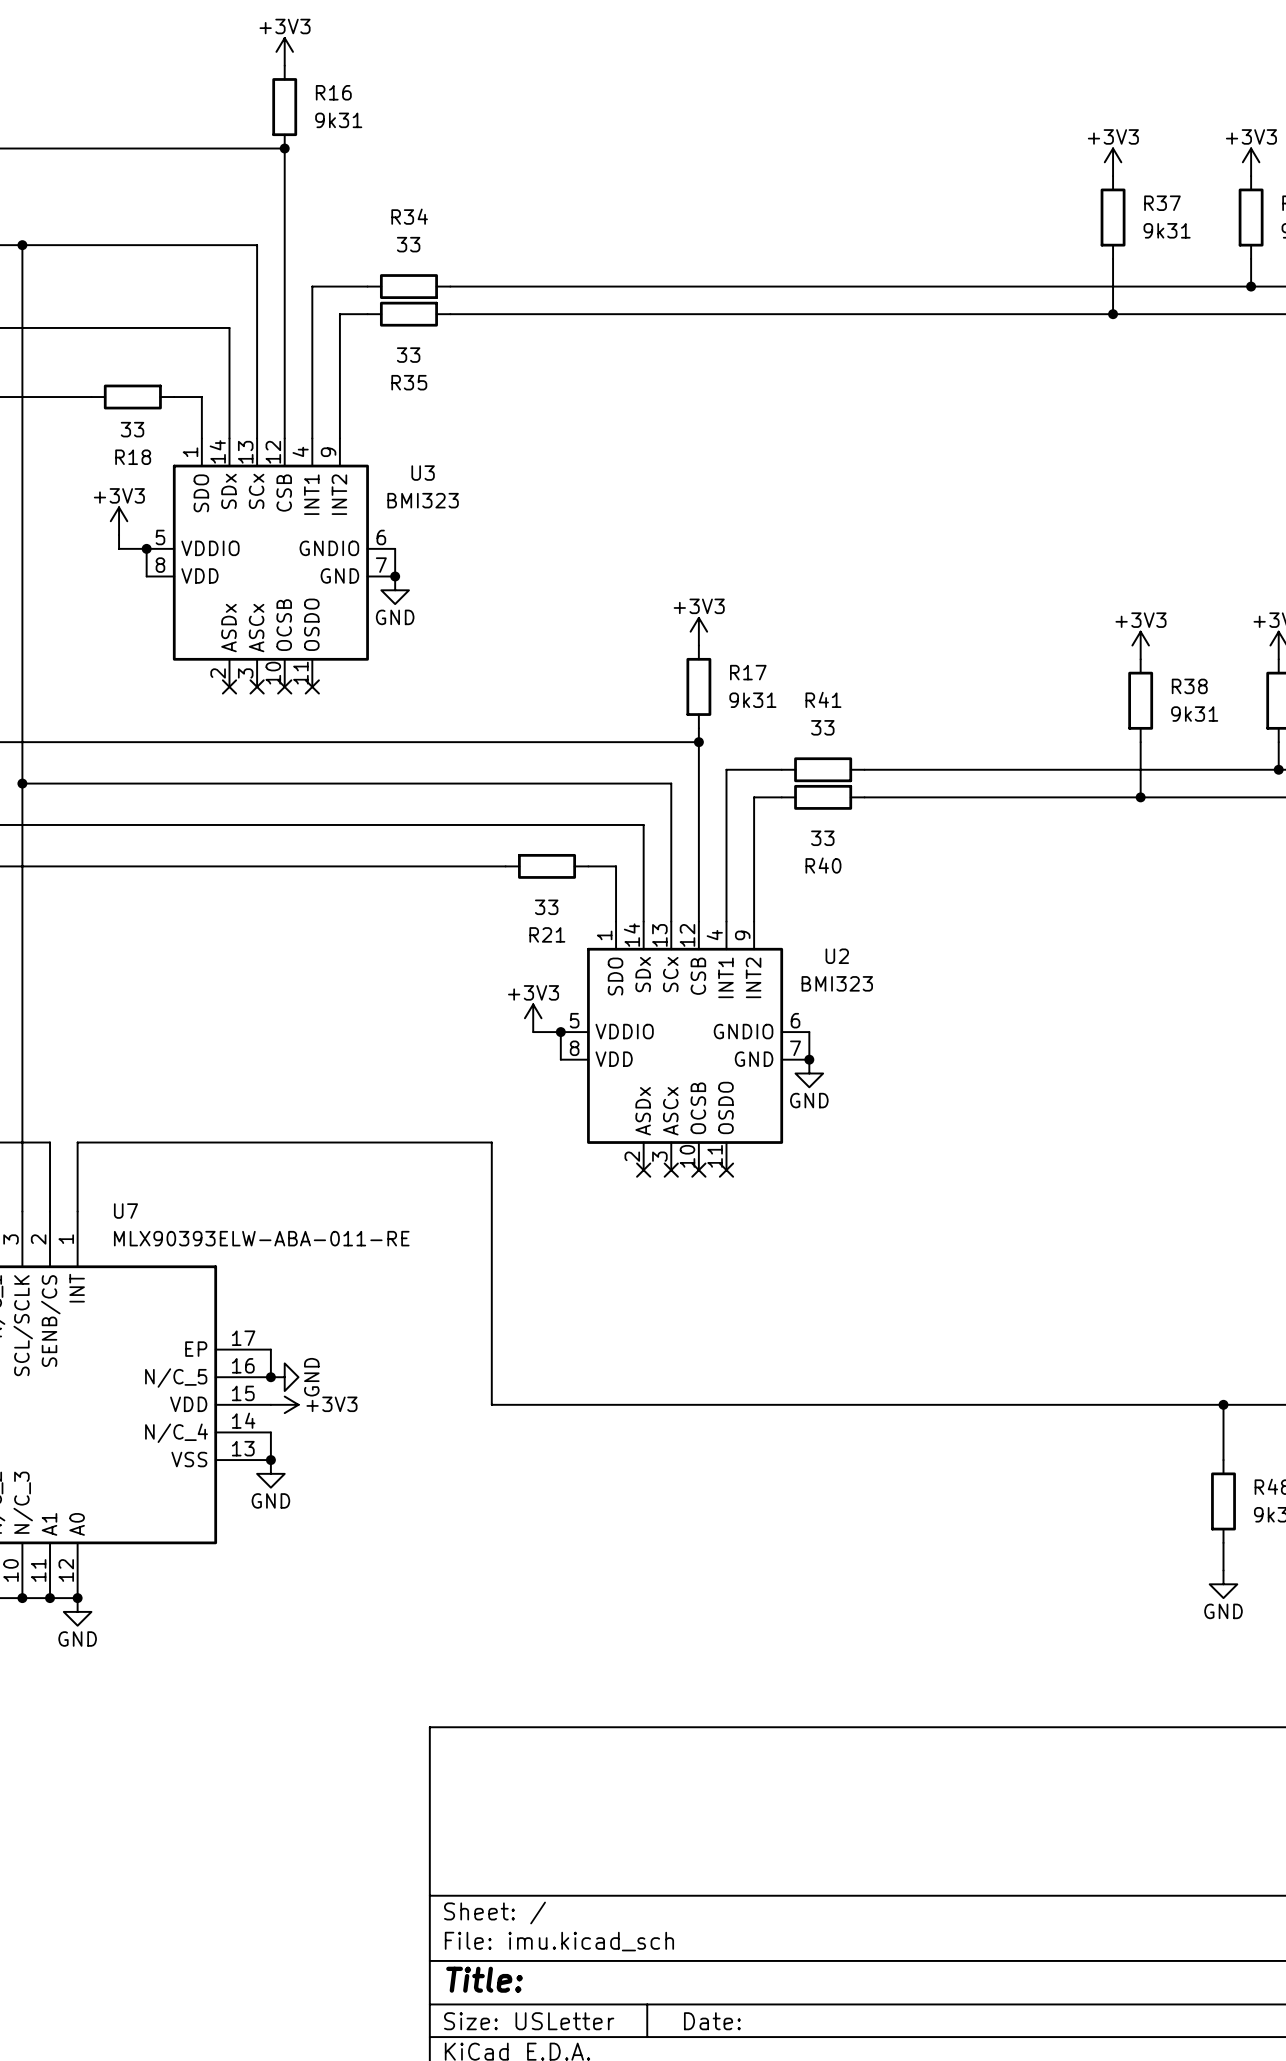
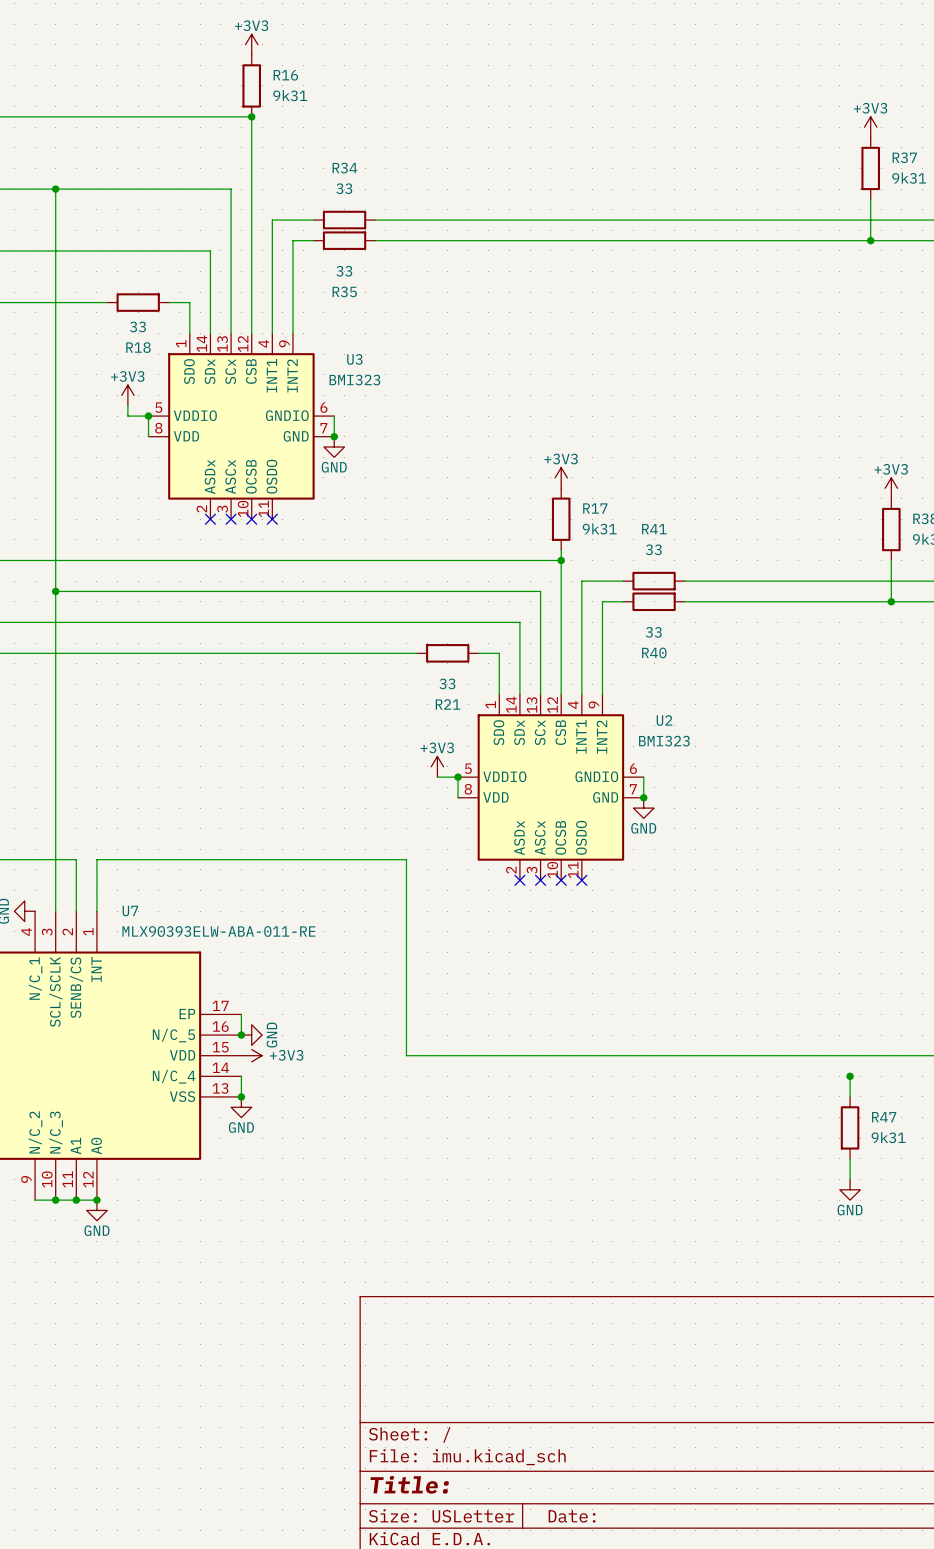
wire: none -> (850, 1076) (850, 1096)
junction: none -> (850, 1076)
R47: none -> 9k31 (850, 1127)
wire: none -> (850, 1158) (850, 1179)
power symbol: none -> GND (850, 1189)

